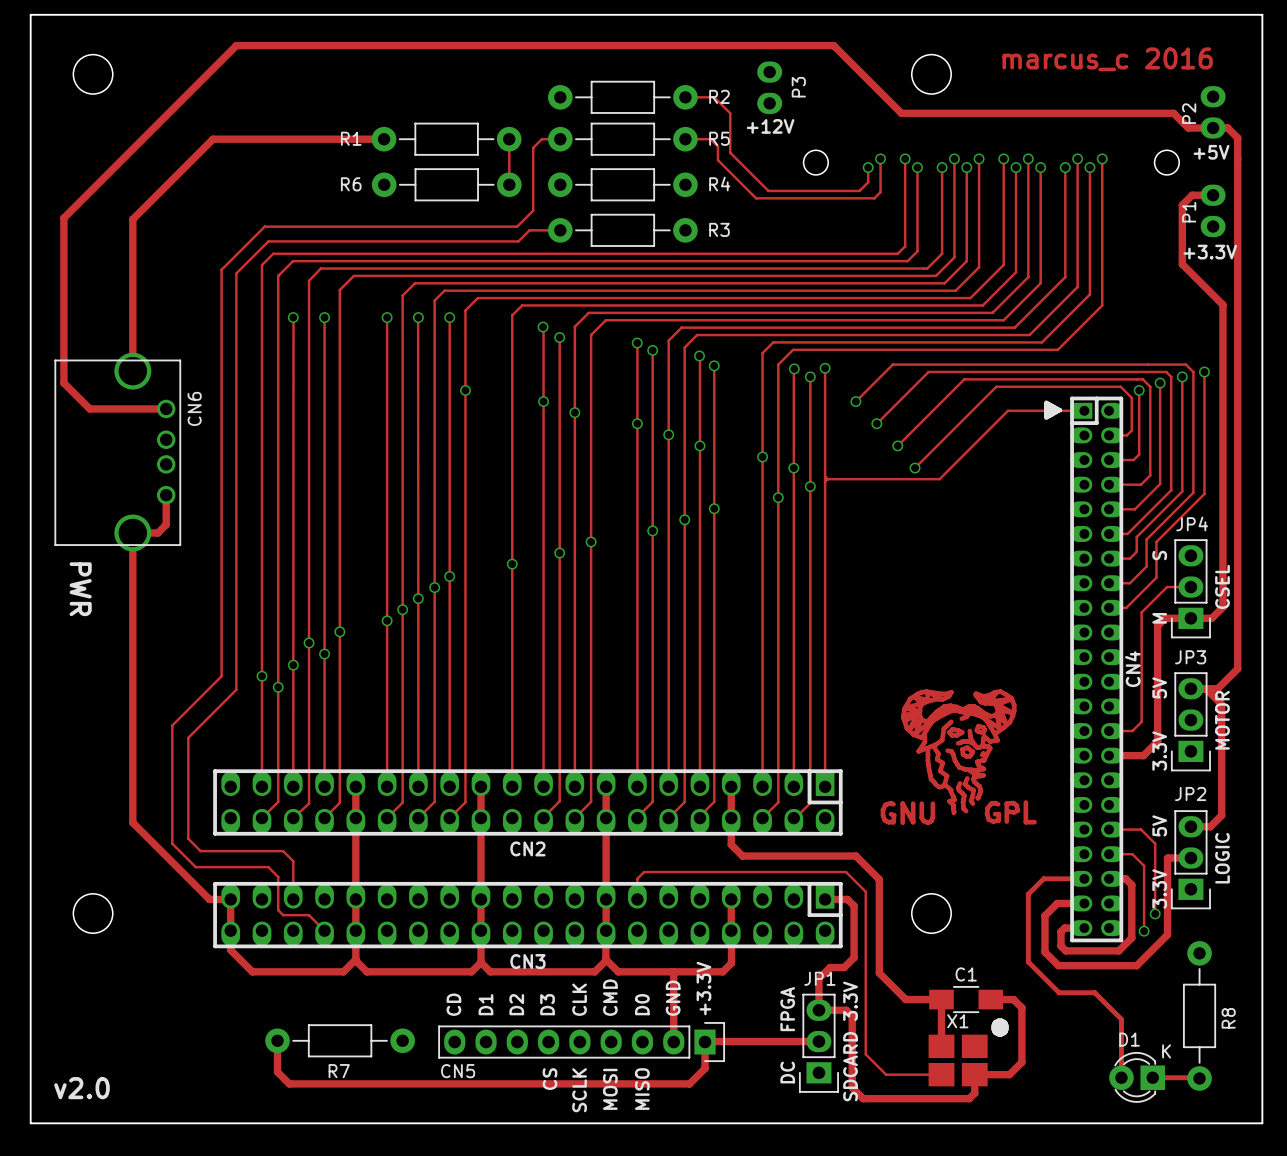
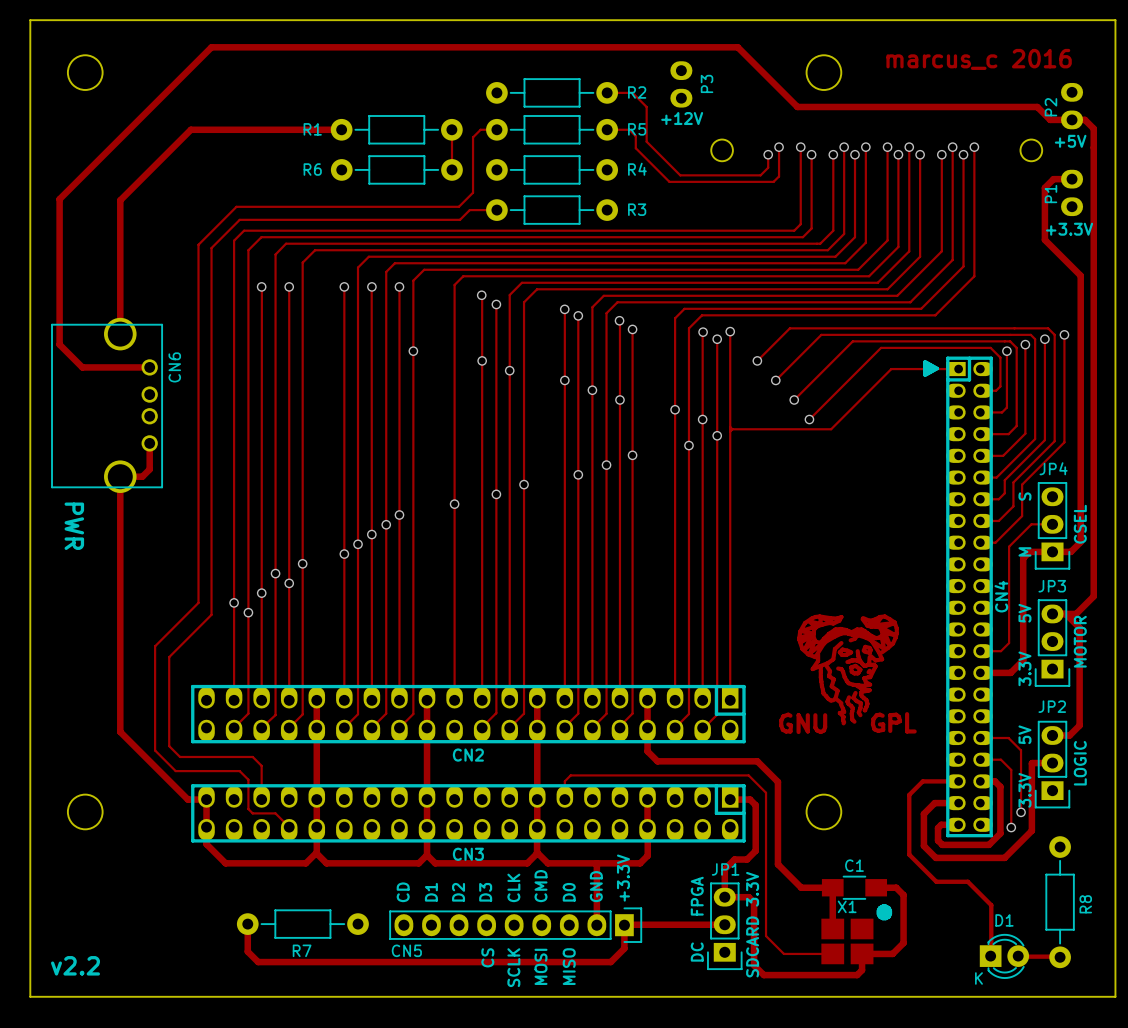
D1 rotation: 0° (1137, 1077) -> 180° (1004, 956)
text: v2.0 (81, 1088) -> v2.2 (75, 965)

